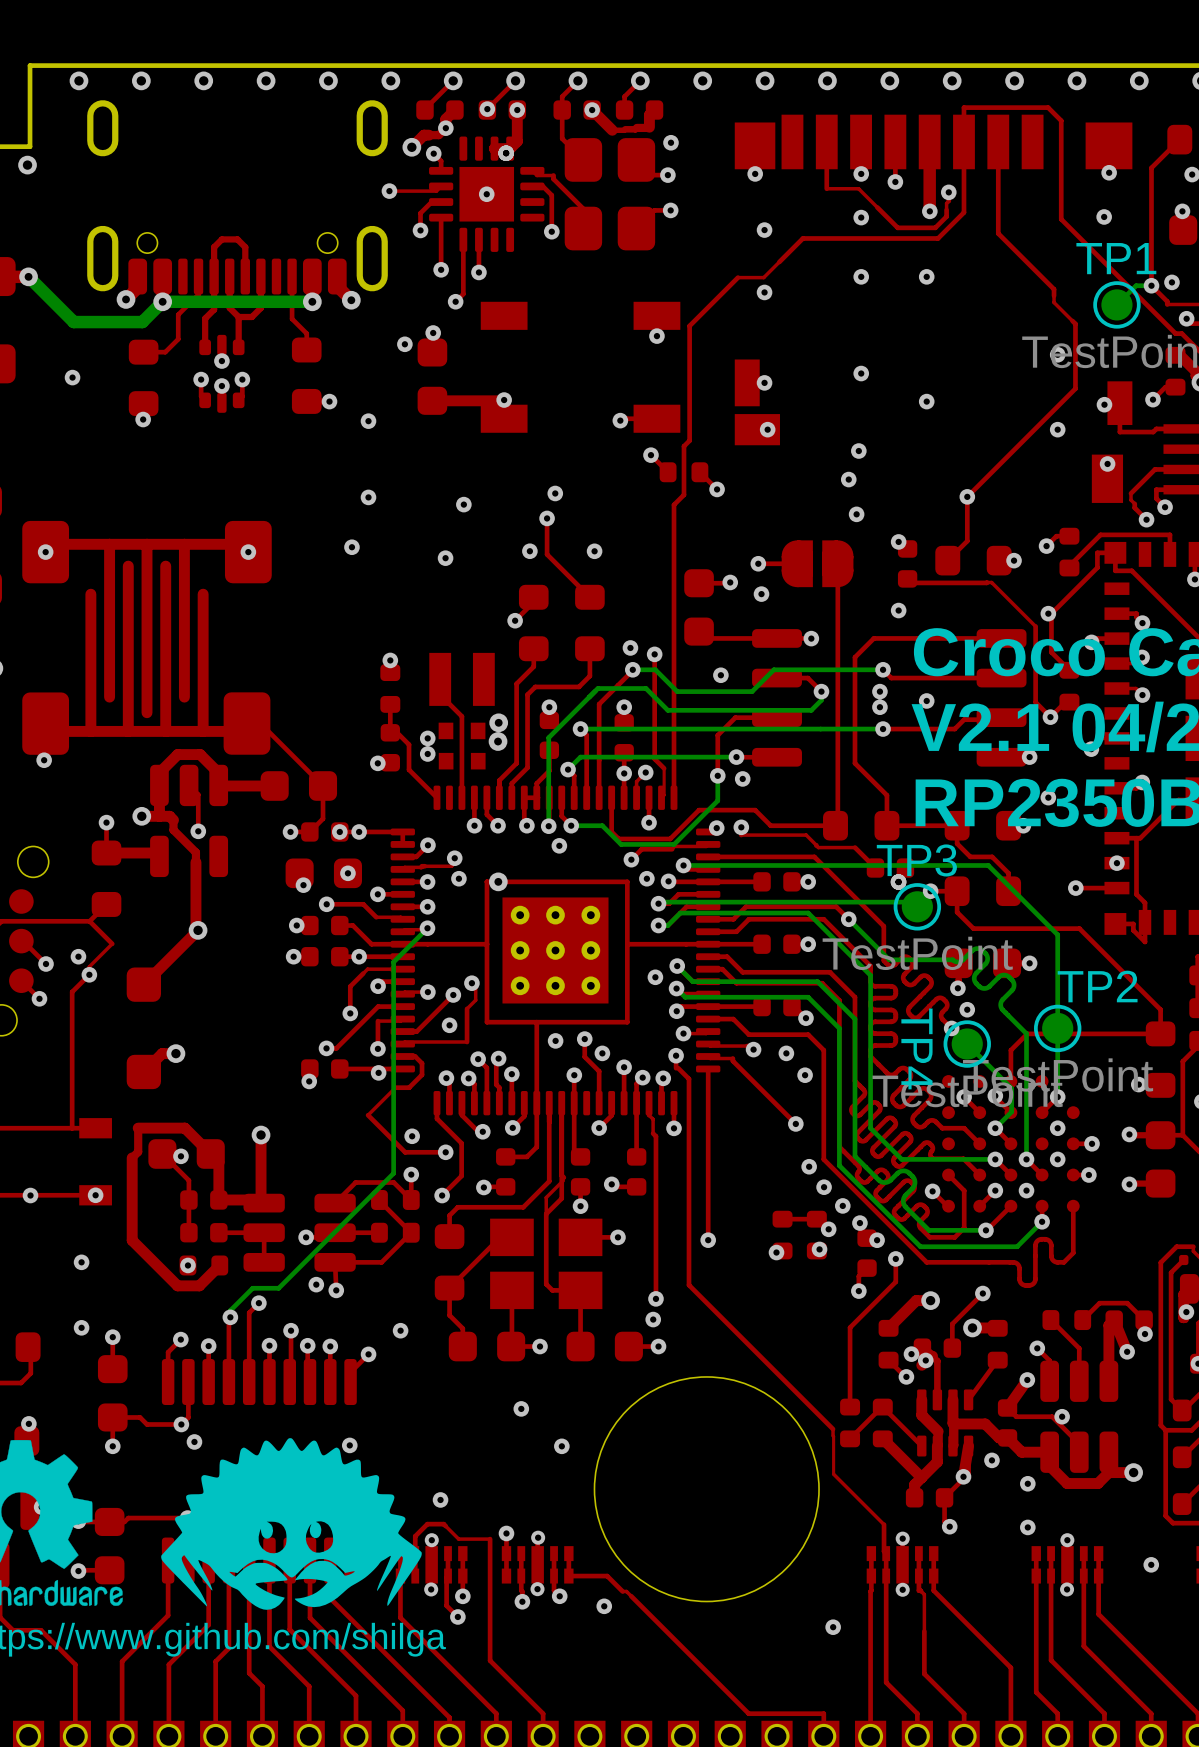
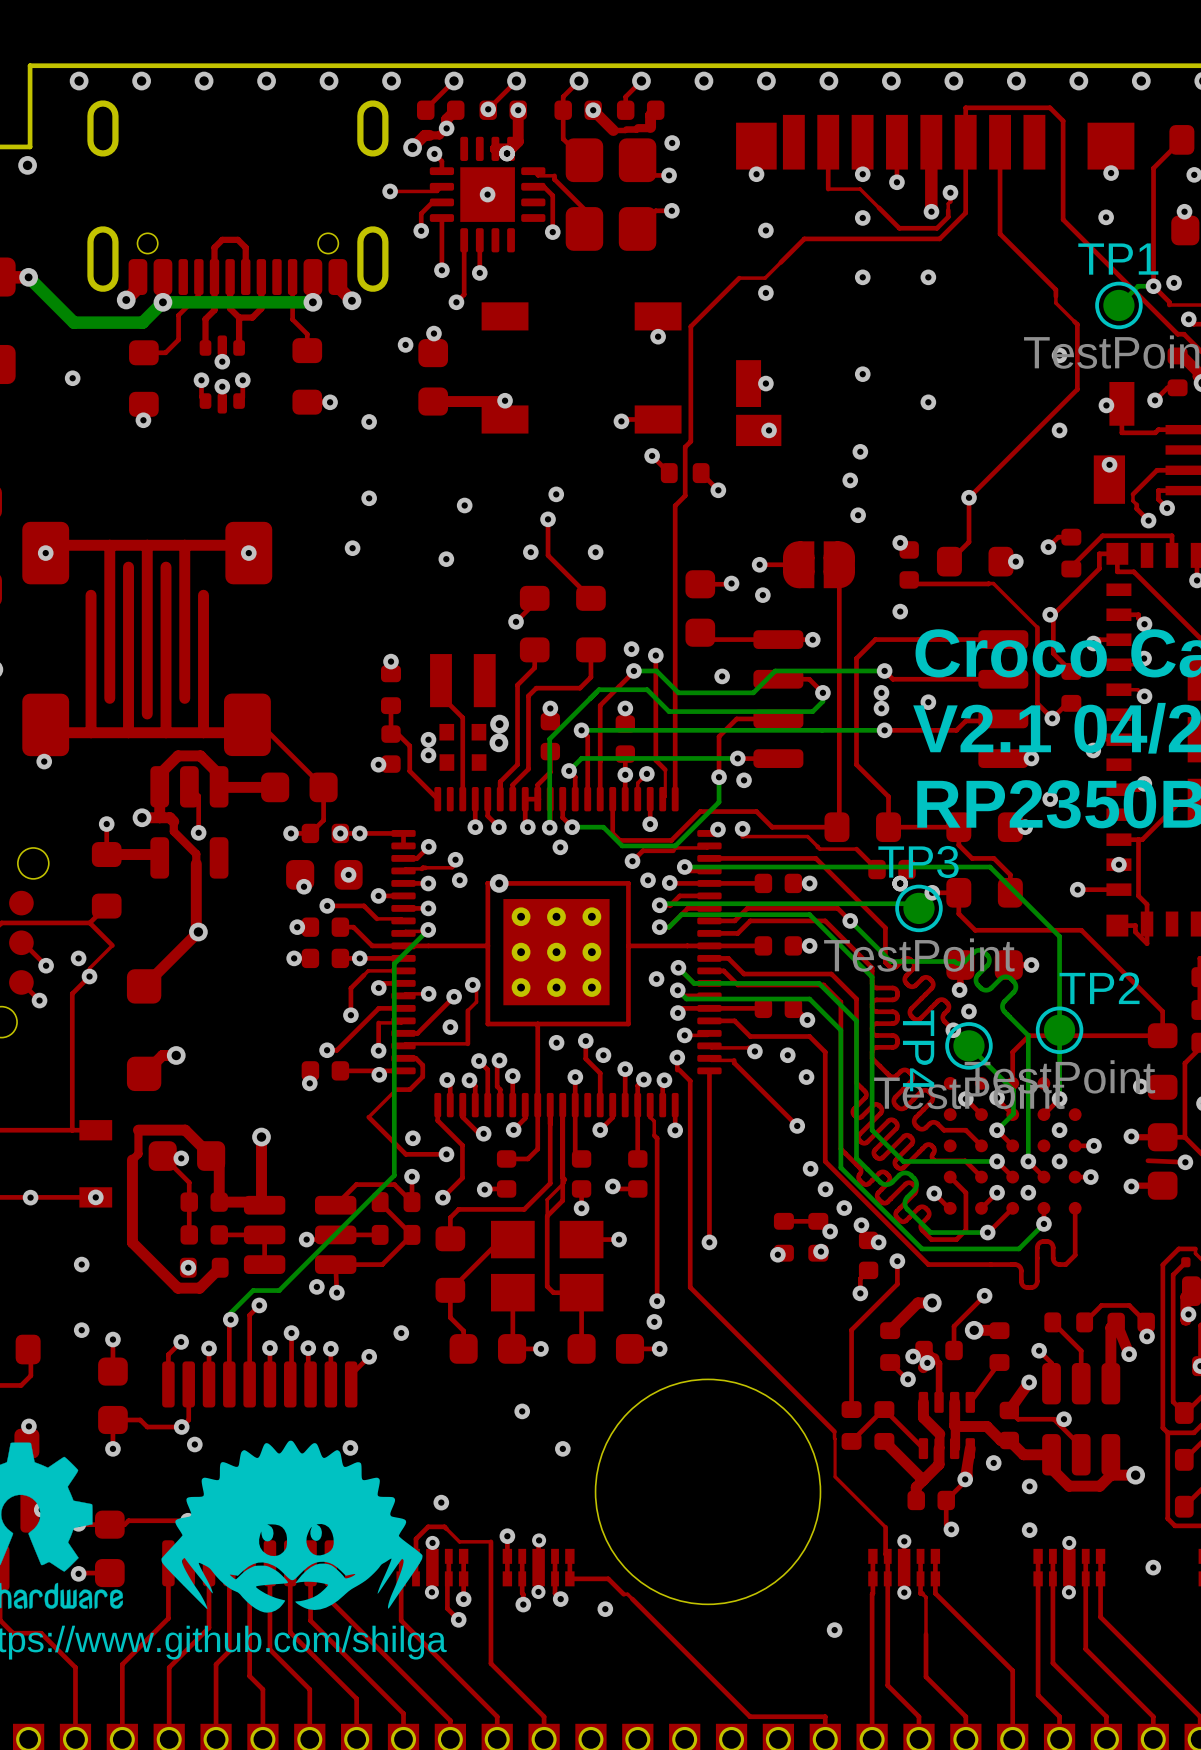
top track: none -> (1147, 1160) (1185, 1162)
via: none -> (1185, 1162)

